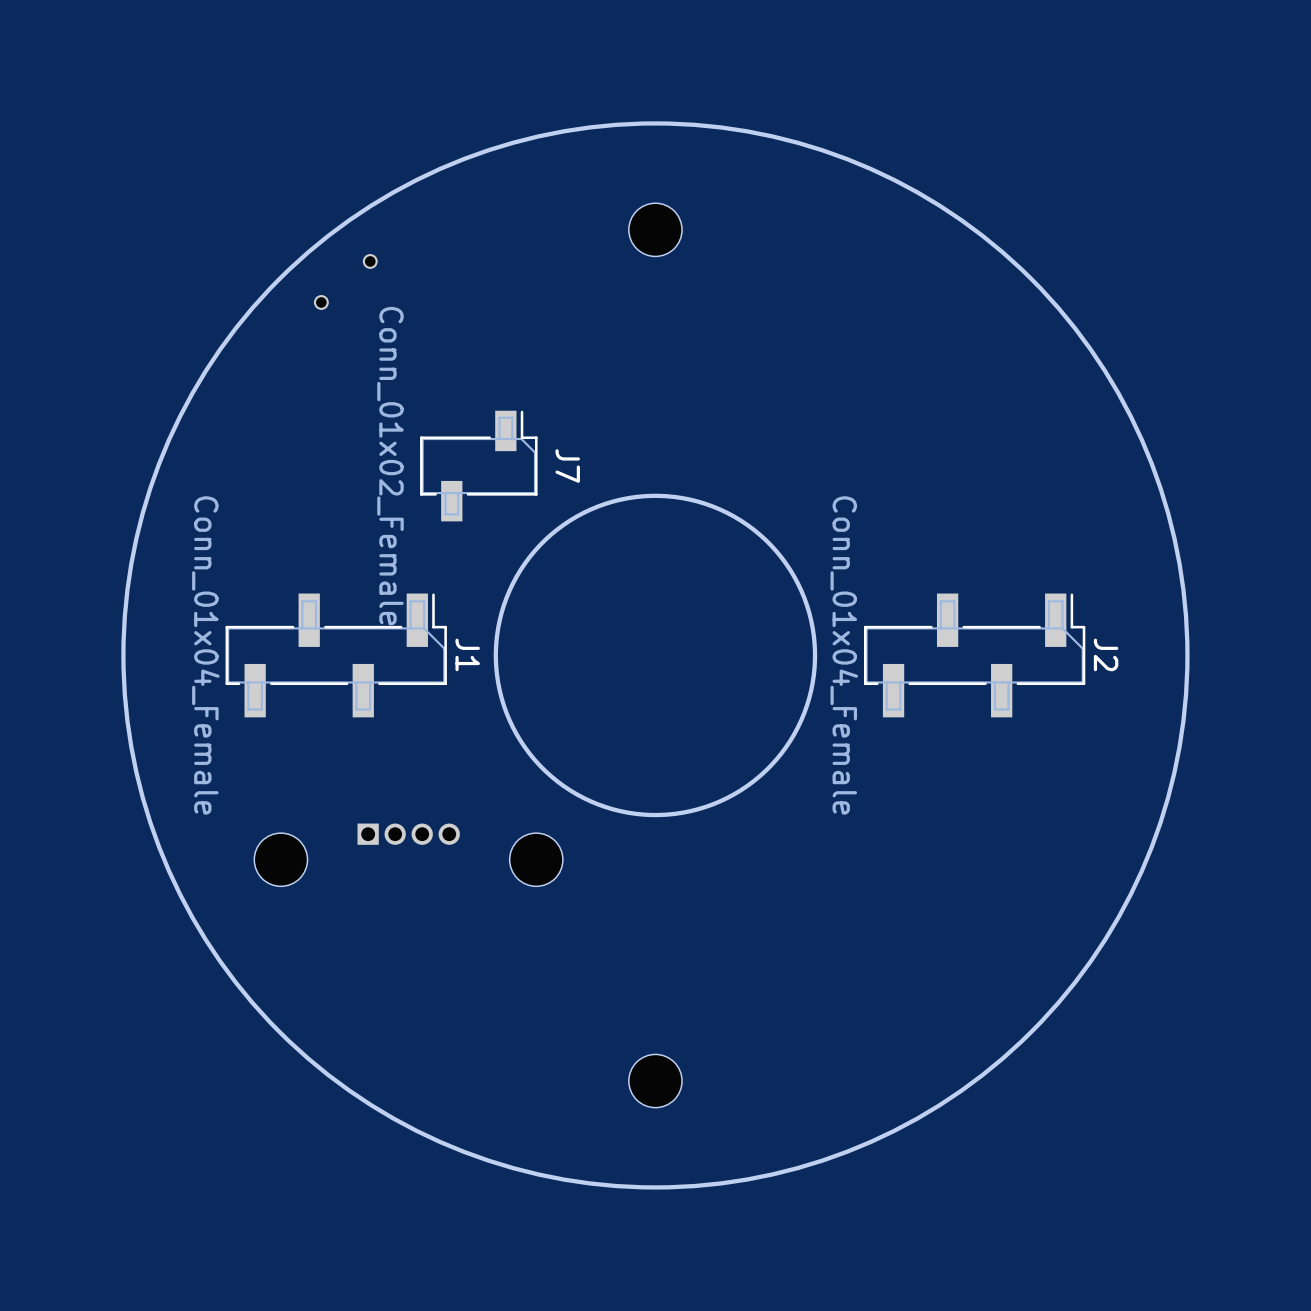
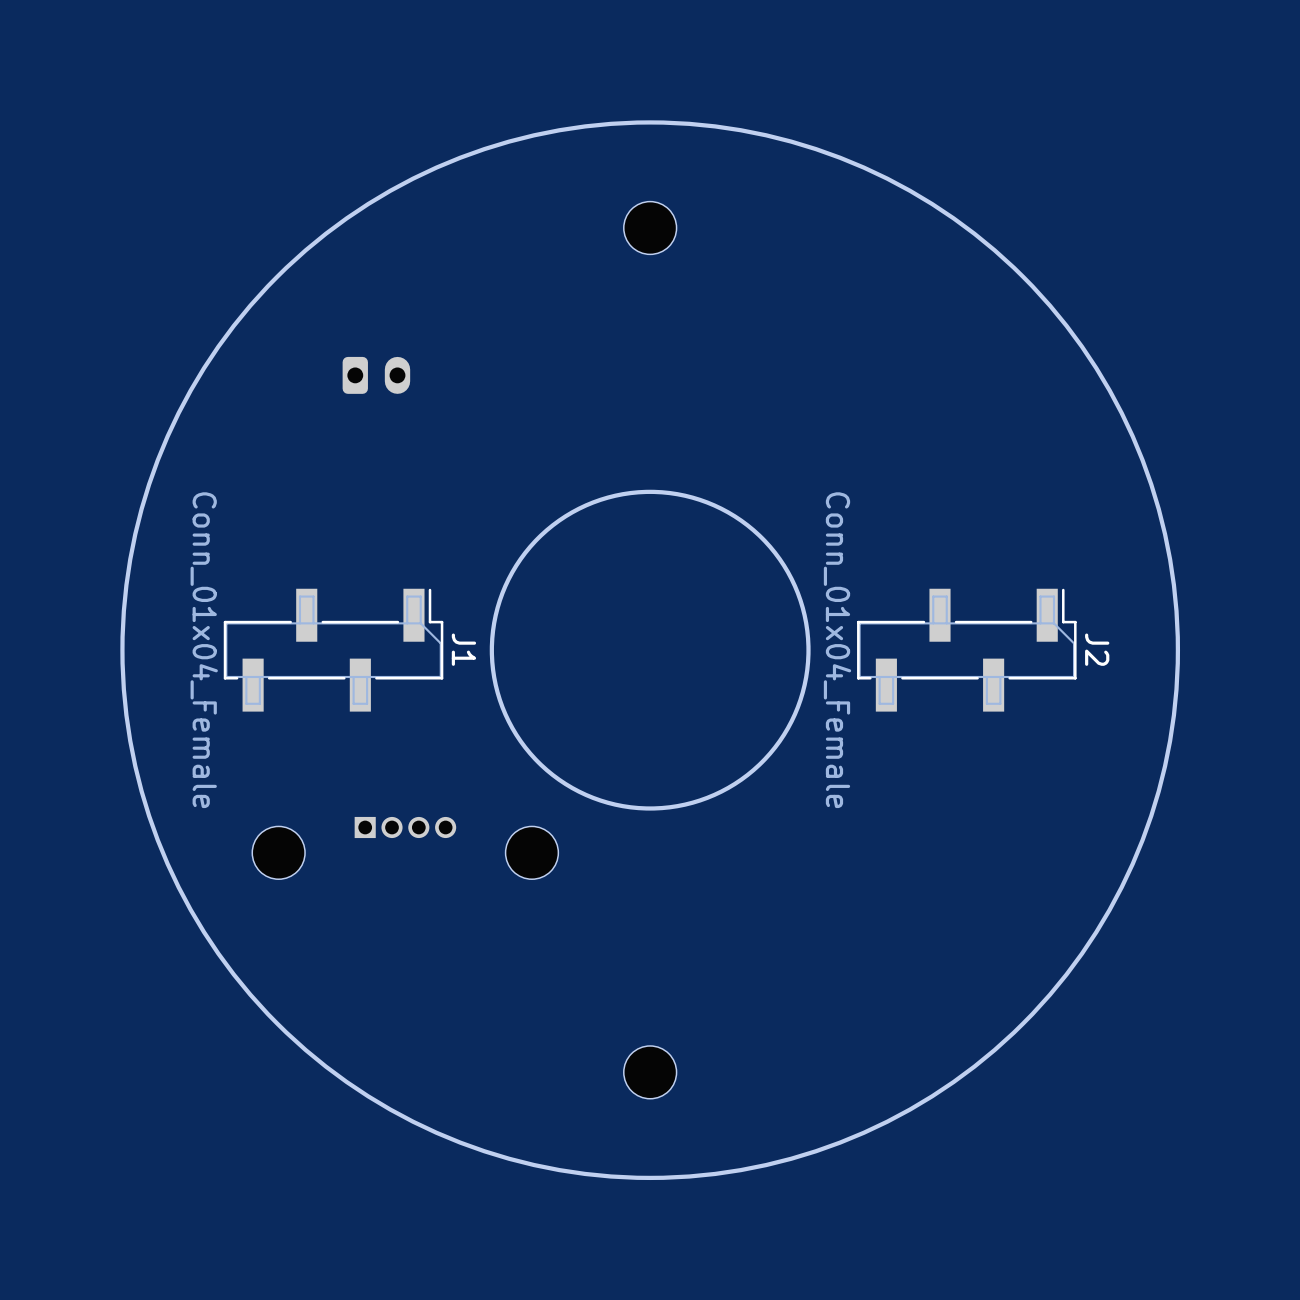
part: (345, 281) -> none
part: none -> (376, 375)
J7: Conn_01x02_Female (478, 466) -> none

